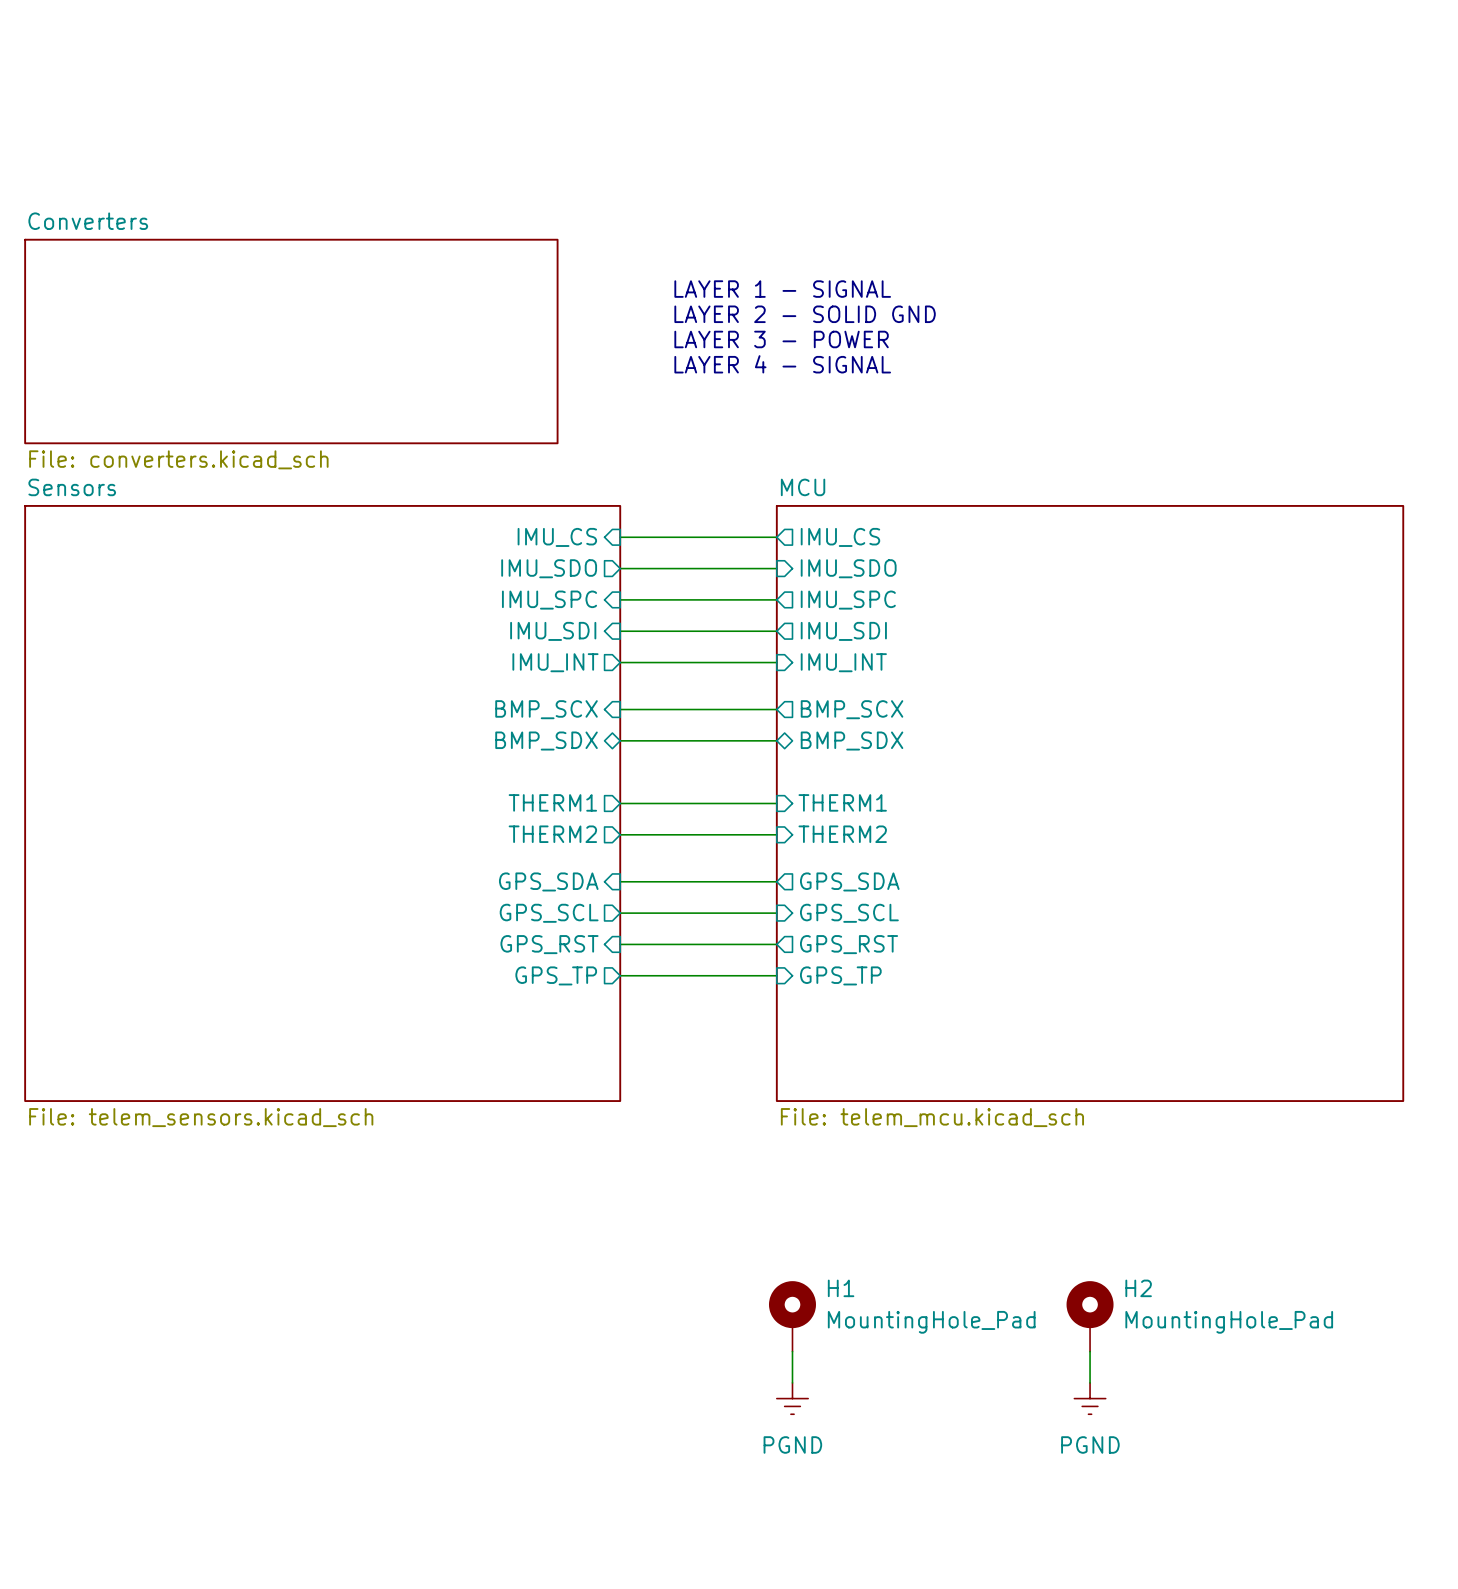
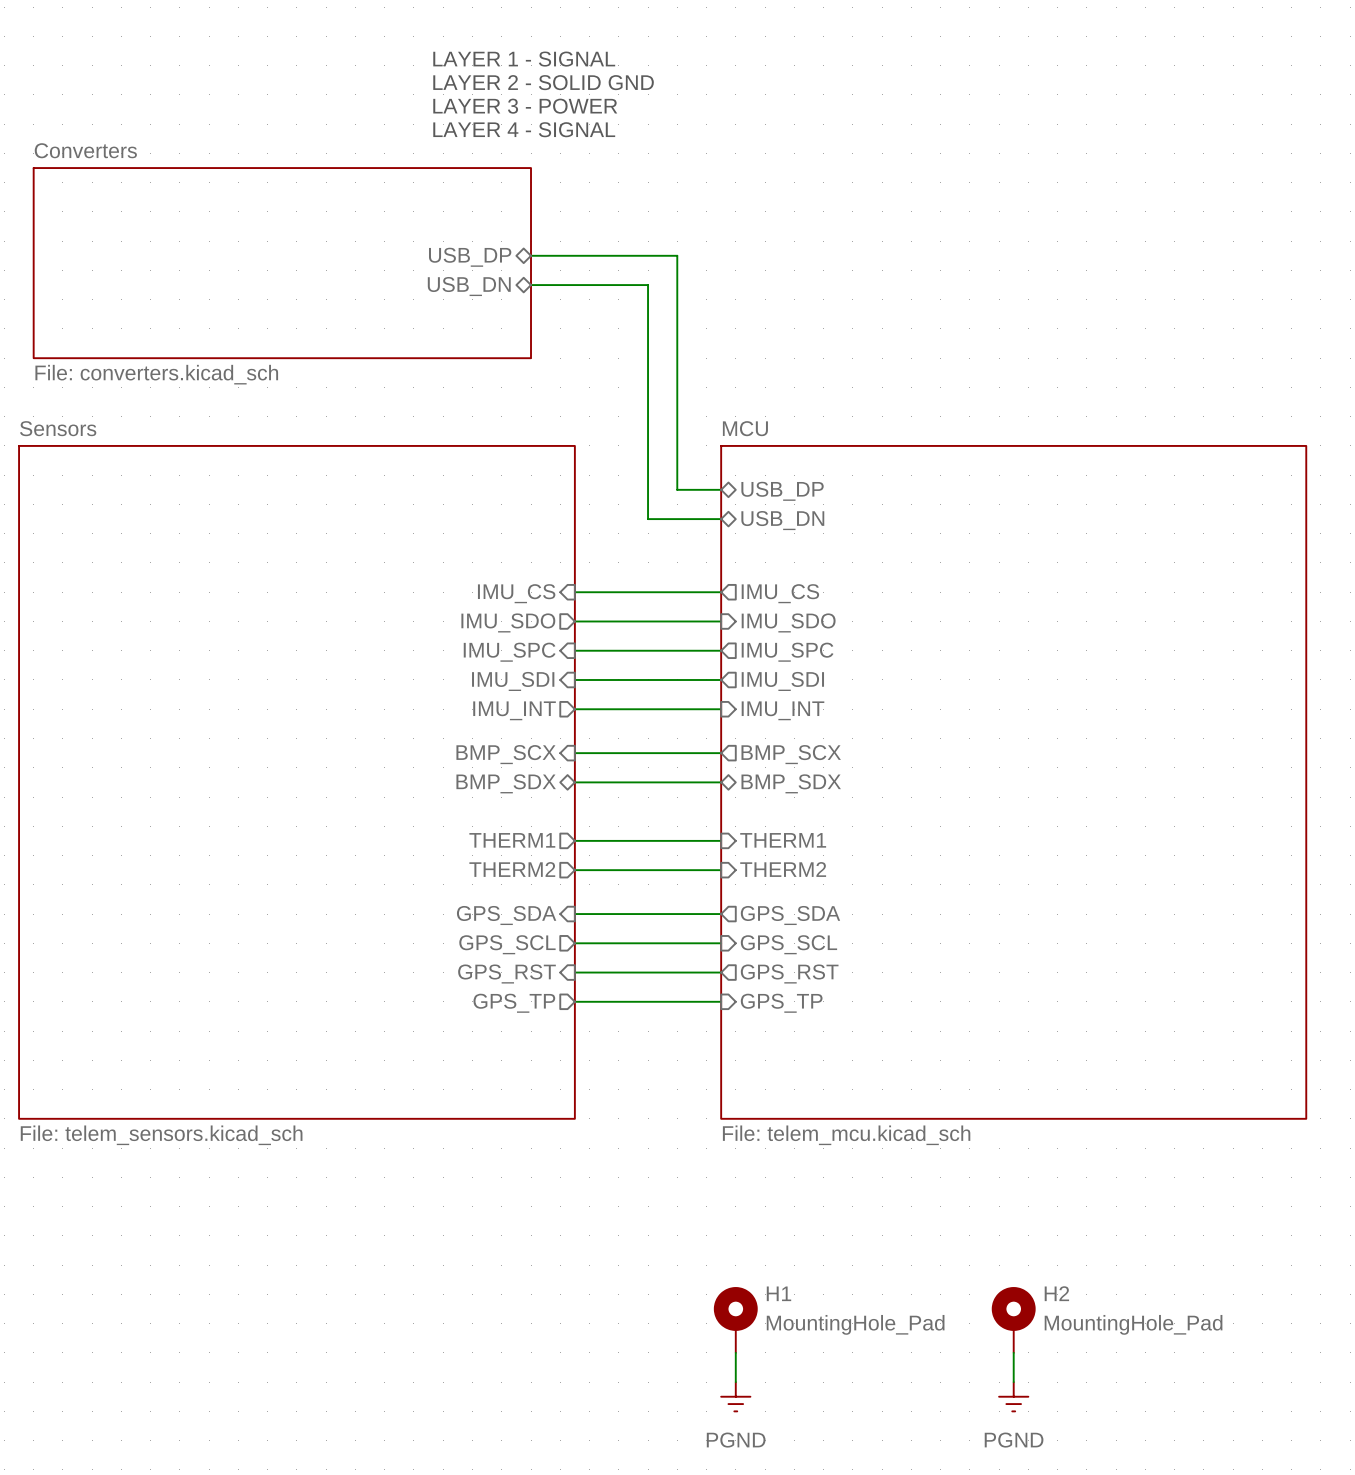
sheet pin: none -> USB_DP (470, 257)
wire: none -> (531, 255) (677, 255) (677, 489) (721, 489)
text position: LAYER 1 - SIGNAL (782, 289) -> LAYER 1 - SIGNAL (524, 59)
sheet pin: none -> USB_DN (469, 286)
wire: none -> (531, 285) (648, 285) (648, 519) (721, 519)
text position: LAYER 2 - SOLID GND (805, 314) -> LAYER 2 - SOLID GND (543, 82)
text position: LAYER 3 - POWER (781, 339) -> LAYER 3 - POWER (525, 106)
sheet Converters position: (291, 341) -> (282, 263)
text position: LAYER 4 - SIGNAL (782, 364) -> LAYER 4 - SIGNAL (524, 129)
sheet pin: none -> USB_DP (782, 491)
sheet pin: IMU_CS (557, 537) -> none
wire: (620, 537) (776, 537) -> (574, 650) (721, 650)
sheet pin: IMU_CS (840, 537) -> none
sheet pin: none -> USB_DN (782, 520)
sheet pin: IMU_SDO (549, 568) -> none
wire: (620, 568) (776, 568) -> (574, 679) (721, 679)
sheet pin: IMU_SDO (848, 568) -> none
wire: (620, 599) (776, 599) -> (574, 709) (721, 709)
sheet pin position: IMU_SPC (549, 600) -> IMU_SPC (509, 652)
sheet pin position: IMU_SPC (848, 600) -> IMU_SPC (787, 652)
sheet pin: IMU_SDI (553, 631) -> IMU_CS (516, 593)
sheet pin: IMU_SDI (843, 631) -> IMU_CS (780, 593)
sheet pin: IMU_INT (555, 662) -> IMU_SDO (508, 622)
sheet pin: IMU_INT (843, 662) -> IMU_SDO (788, 622)
sheet pin: BMP_SCX (546, 709) -> none
wire: (620, 709) (776, 709) -> (574, 943) (721, 943)
sheet pin: BMP_SCX (852, 709) -> none
sheet pin: none -> IMU_SDI (513, 681)
sheet pin: none -> IMU_SDI (782, 681)
wire: (620, 740) (776, 740) -> (574, 840) (721, 840)
sheet pin: BMP_SDX (546, 741) -> none
sheet pin: BMP_SDX (852, 741) -> none
sheet pin: none -> IMU_INT (514, 710)
sheet pin: none -> IMU_INT (783, 710)
sheet pin shape: output (552, 802) -> input (506, 754)
sheet pin: THERM1 (552, 802) -> BMP_SCX (506, 754)
sheet pin shape: input (842, 802) -> output (791, 754)
sheet pin: THERM1 (842, 802) -> BMP_SCX (791, 754)
sheet Sensors: File: telem_sensors.kicad_sch (322, 803) -> none
sheet MCU: File: telem_mcu.kicad_sch (1090, 803) -> none
sheet Sensors: none -> File: telem_sensors.kicad_sch (296, 782)
sheet pin shape: output (552, 834) -> bidirectional (506, 783)
sheet pin: THERM2 (552, 834) -> BMP_SDX (506, 783)
sheet pin shape: input (842, 834) -> bidirectional (791, 783)
sheet pin: THERM2 (842, 834) -> BMP_SDX (791, 783)
sheet MCU: none -> File: telem_mcu.kicad_sch (1013, 782)
sheet pin: GPS_SDA (548, 881) -> none
wire: (620, 881) (776, 881) -> (574, 972) (721, 972)
sheet pin: GPS_SDA (849, 881) -> none
sheet pin: none -> THERM1 (512, 840)
sheet pin: none -> THERM1 (783, 840)
sheet pin position: GPS_SCL (549, 913) -> GPS_SCL (507, 944)
wire: (620, 913) (776, 913) -> (574, 1001) (721, 1001)
sheet pin position: GPS_SCL (849, 913) -> GPS_SCL (788, 944)
sheet pin: none -> THERM2 (512, 869)
sheet pin: none -> THERM2 (783, 869)
sheet pin position: GPS_RST (549, 944) -> GPS_RST (506, 974)
wire: (620, 944) (776, 944) -> (574, 870) (721, 870)
sheet pin position: GPS_RST (849, 944) -> GPS_RST (789, 974)
sheet pin shape: output (556, 975) -> input (506, 915)
sheet pin: GPS_TP (556, 975) -> GPS_SDA (506, 915)
sheet pin shape: input (840, 975) -> output (790, 915)
sheet pin: GPS_TP (840, 975) -> GPS_SDA (790, 915)
sheet pin: none -> GPS_TP (514, 1003)
sheet pin: none -> GPS_TP (781, 1003)
H1 position: (792, 1316) -> (735, 1319)
H2 position: (1090, 1316) -> (1013, 1319)
wire: (792, 1351) (792, 1382) -> (735, 1352) (735, 1382)
wire: (1090, 1351) (1090, 1382) -> (1013, 1352) (1013, 1382)
power symbol position: PGND (792, 1398) -> PGND (735, 1396)
power symbol position: PGND (1090, 1398) -> PGND (1013, 1396)

